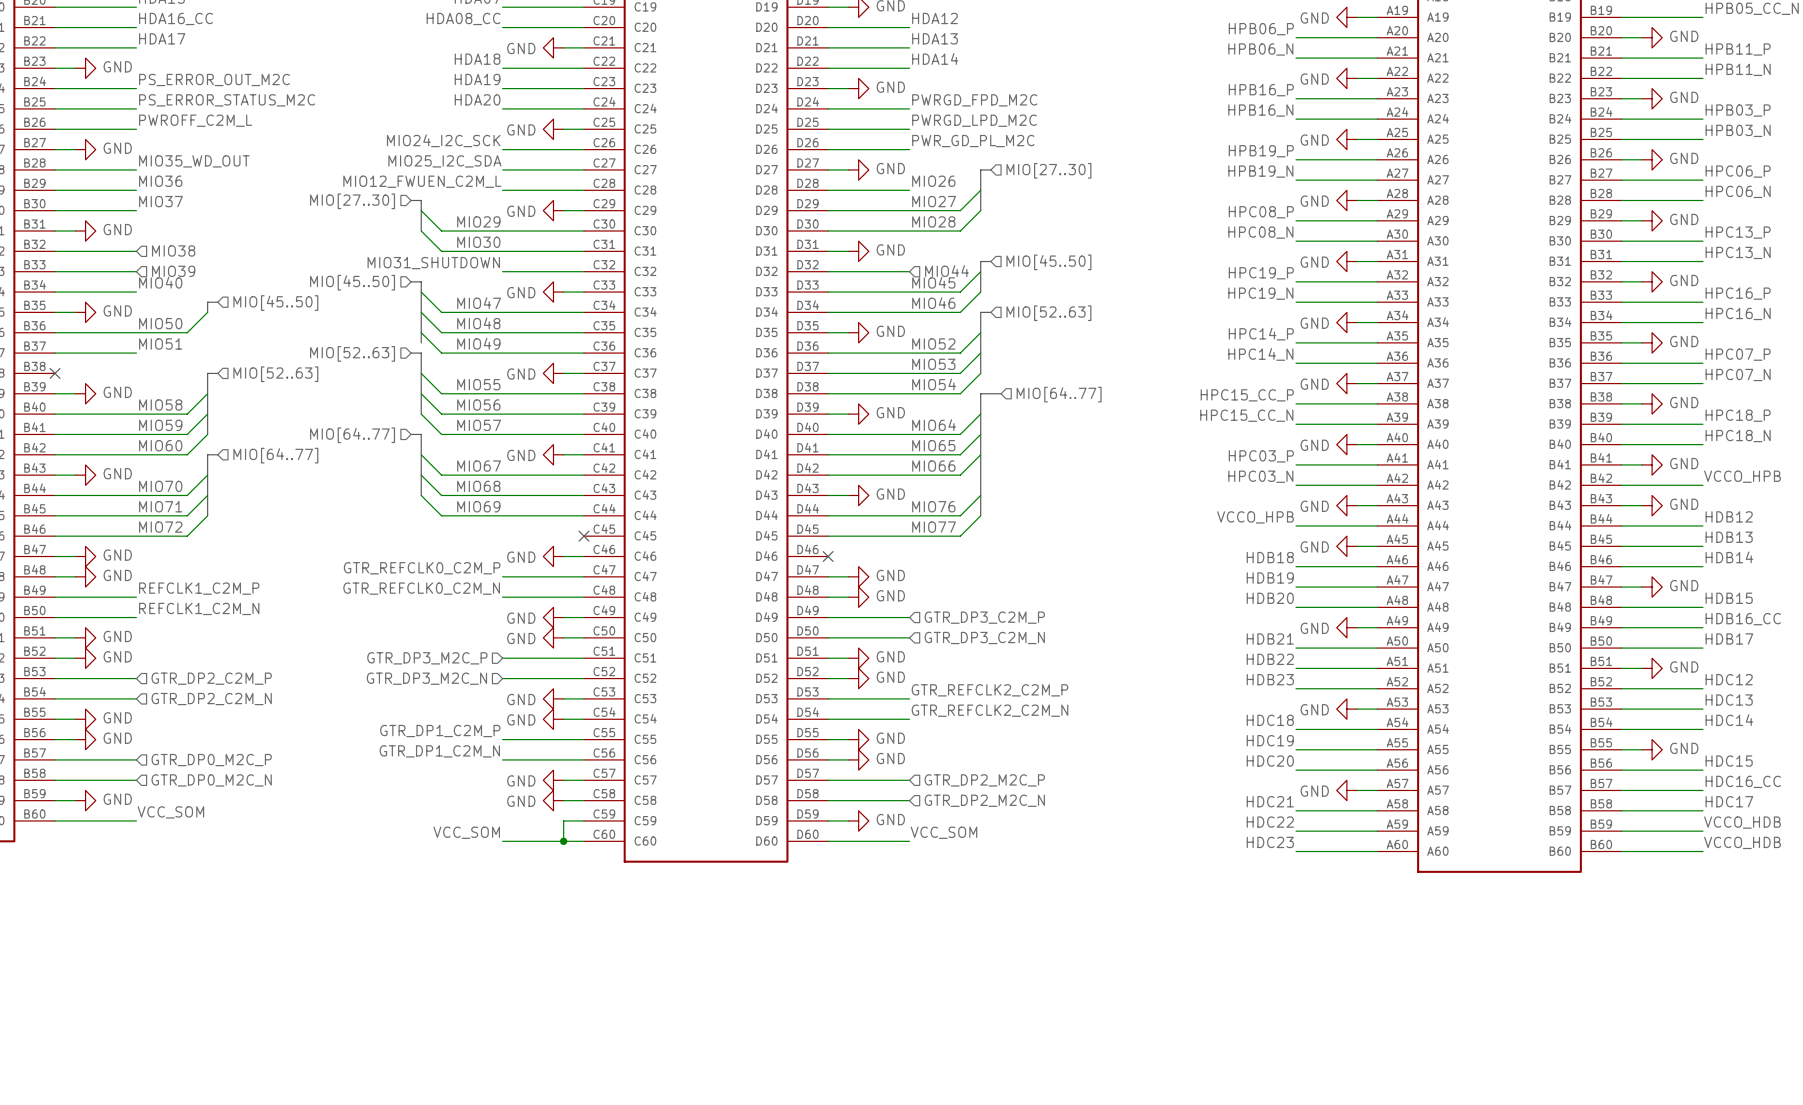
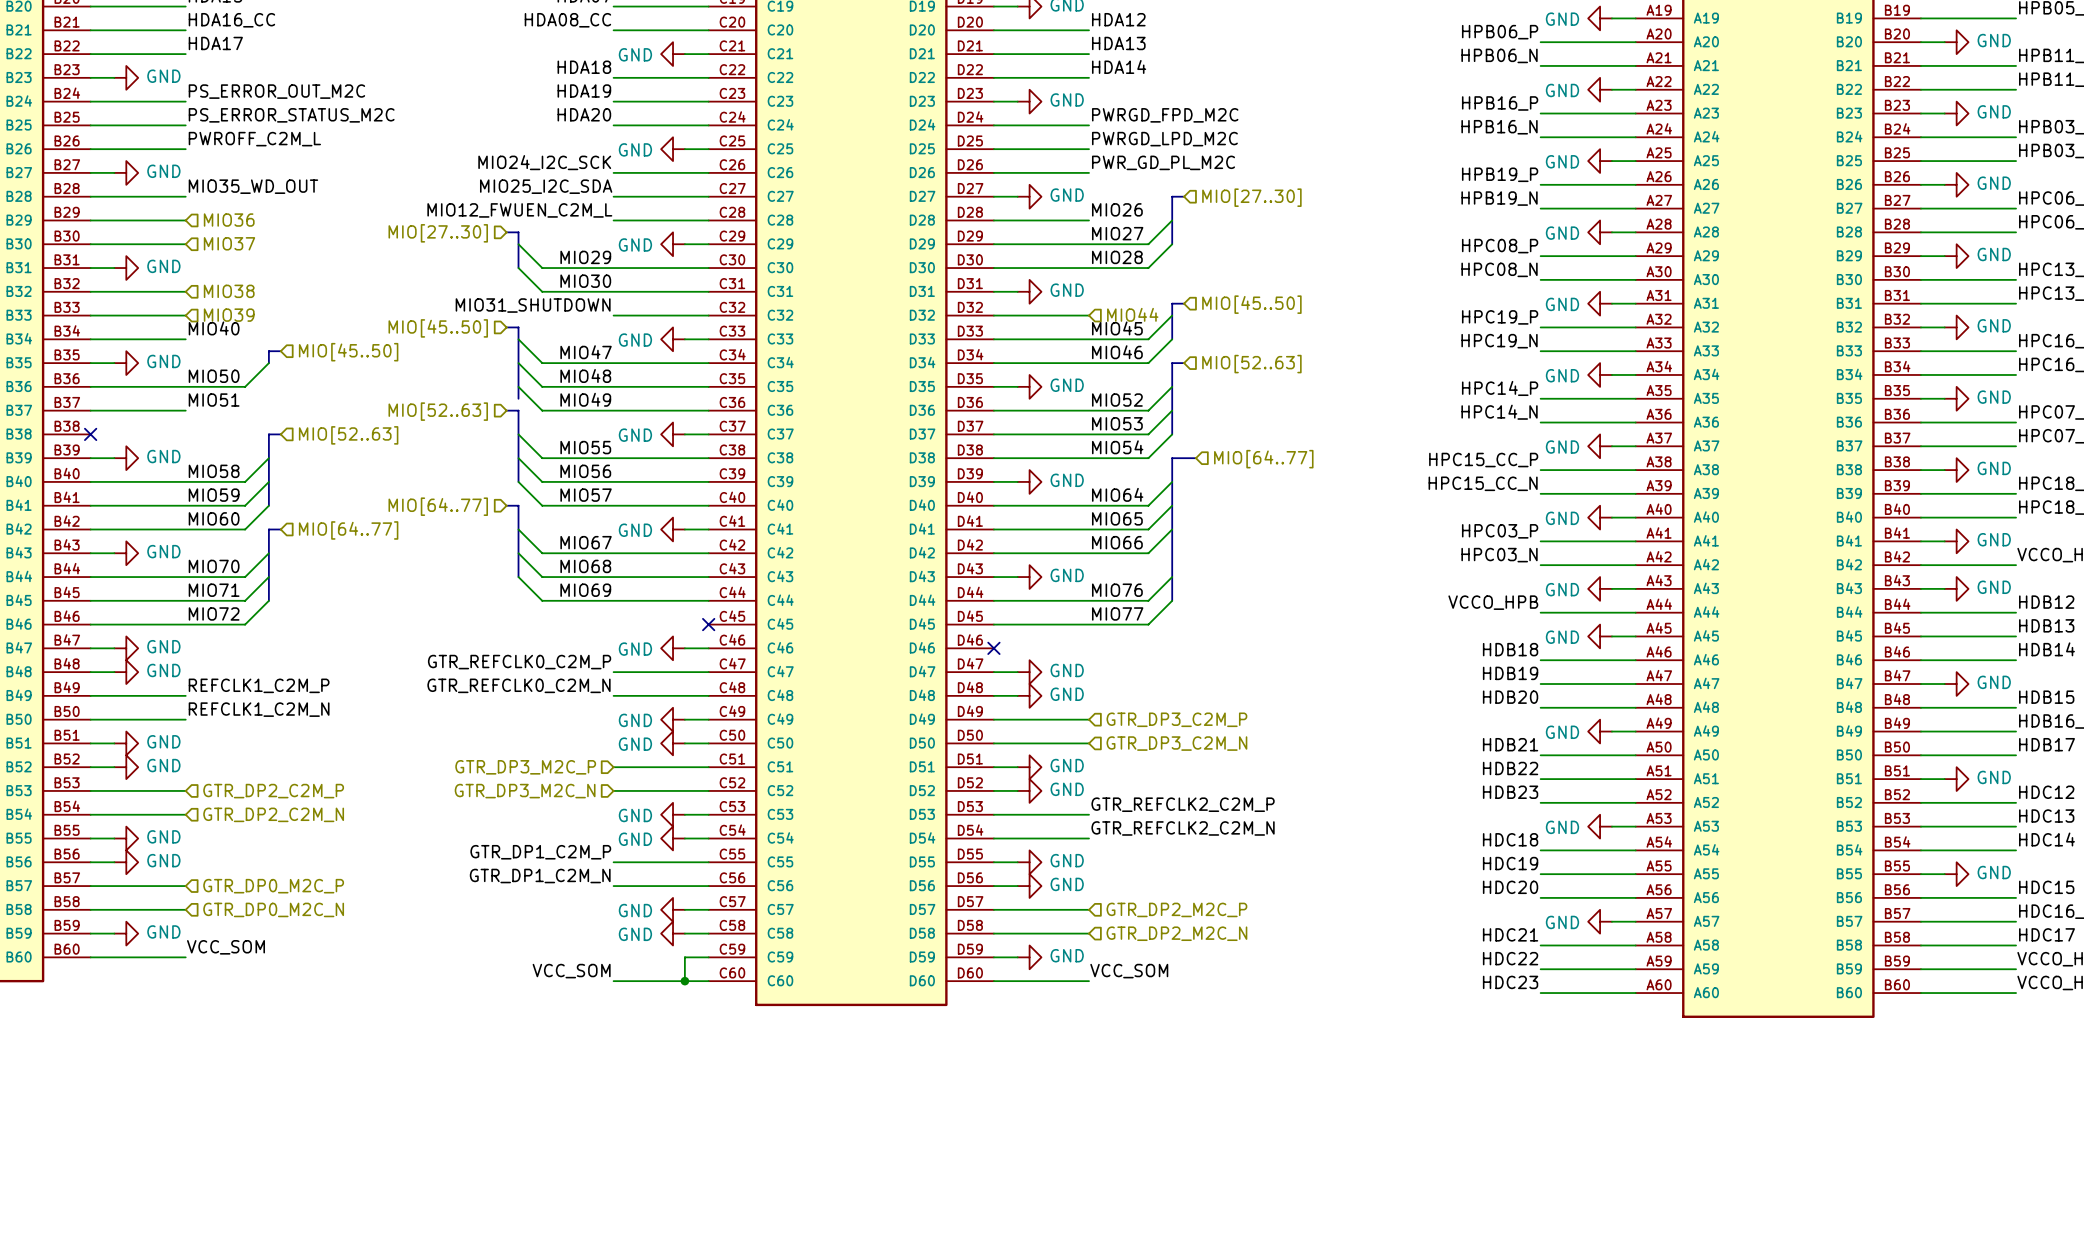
label: MIO36 (160, 181) -> none
hierarchical label: none -> MIO36 (229, 220)
label: MIO37 (160, 201) -> none
hierarchical label: none -> MIO37 (229, 243)

